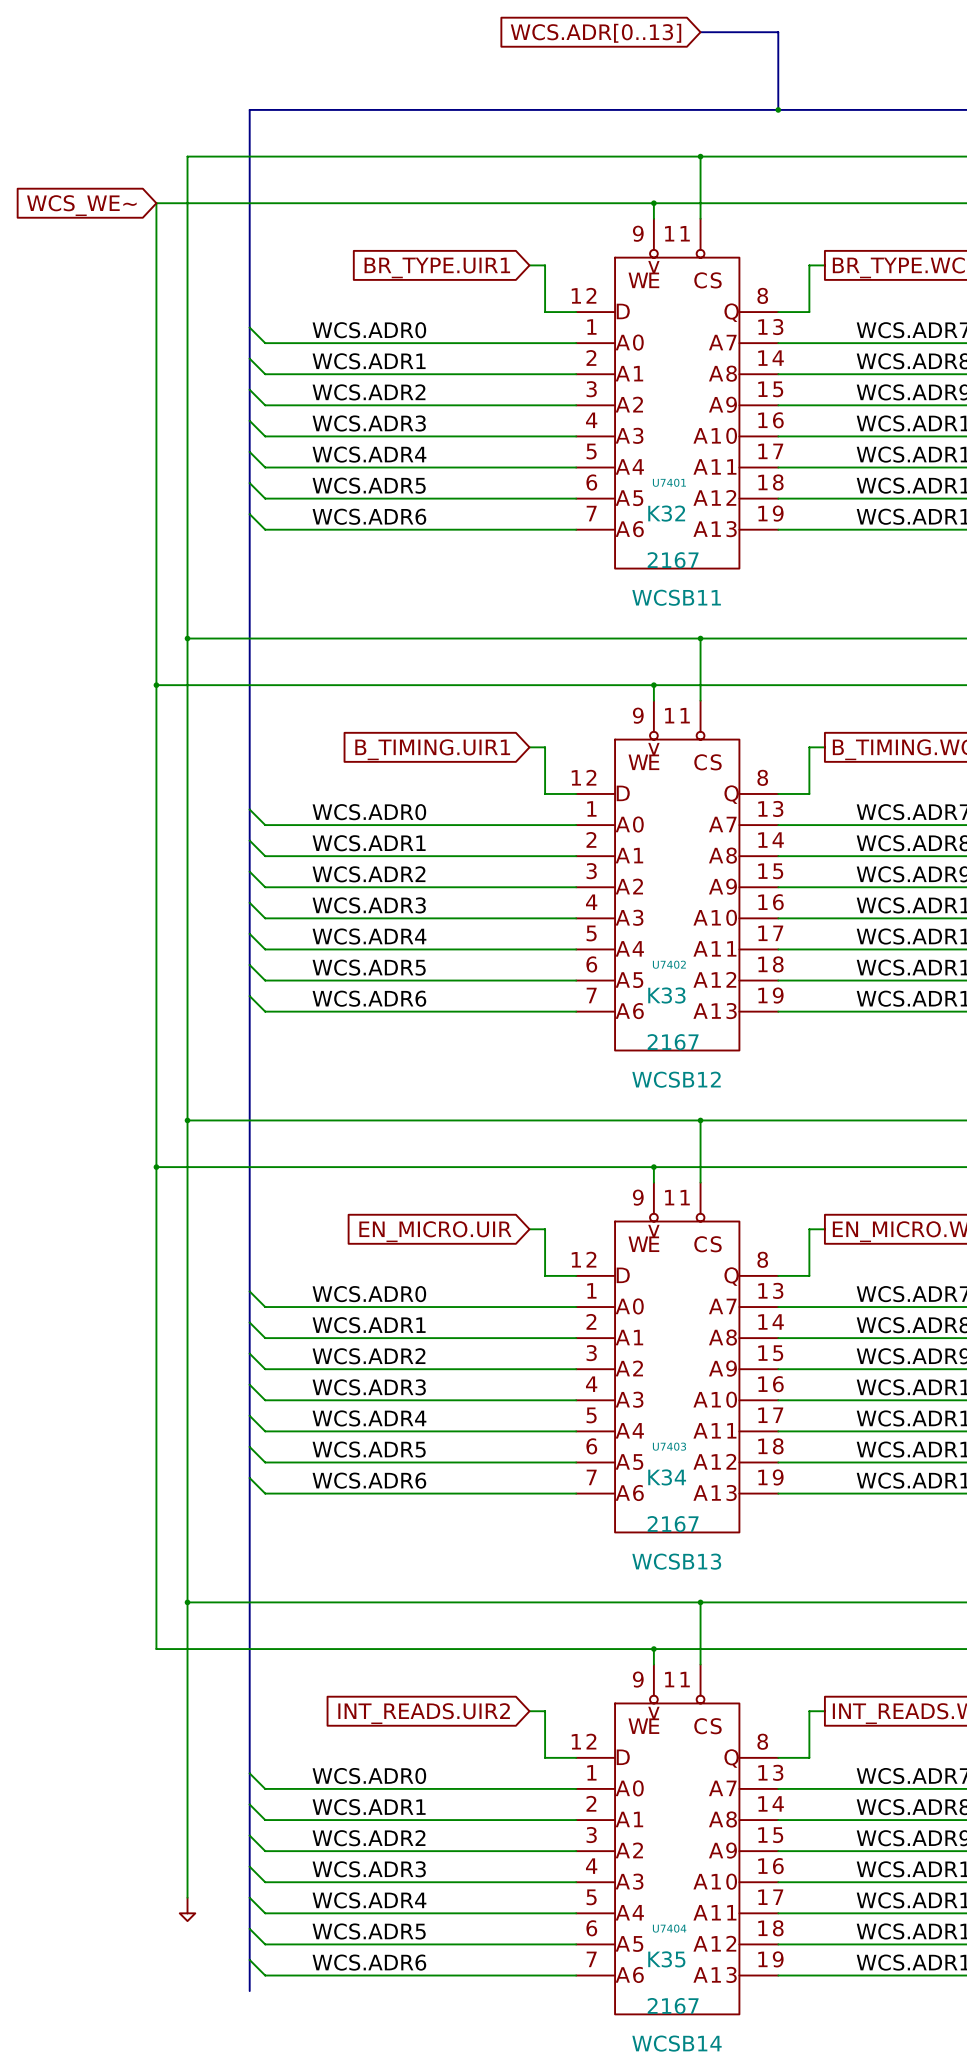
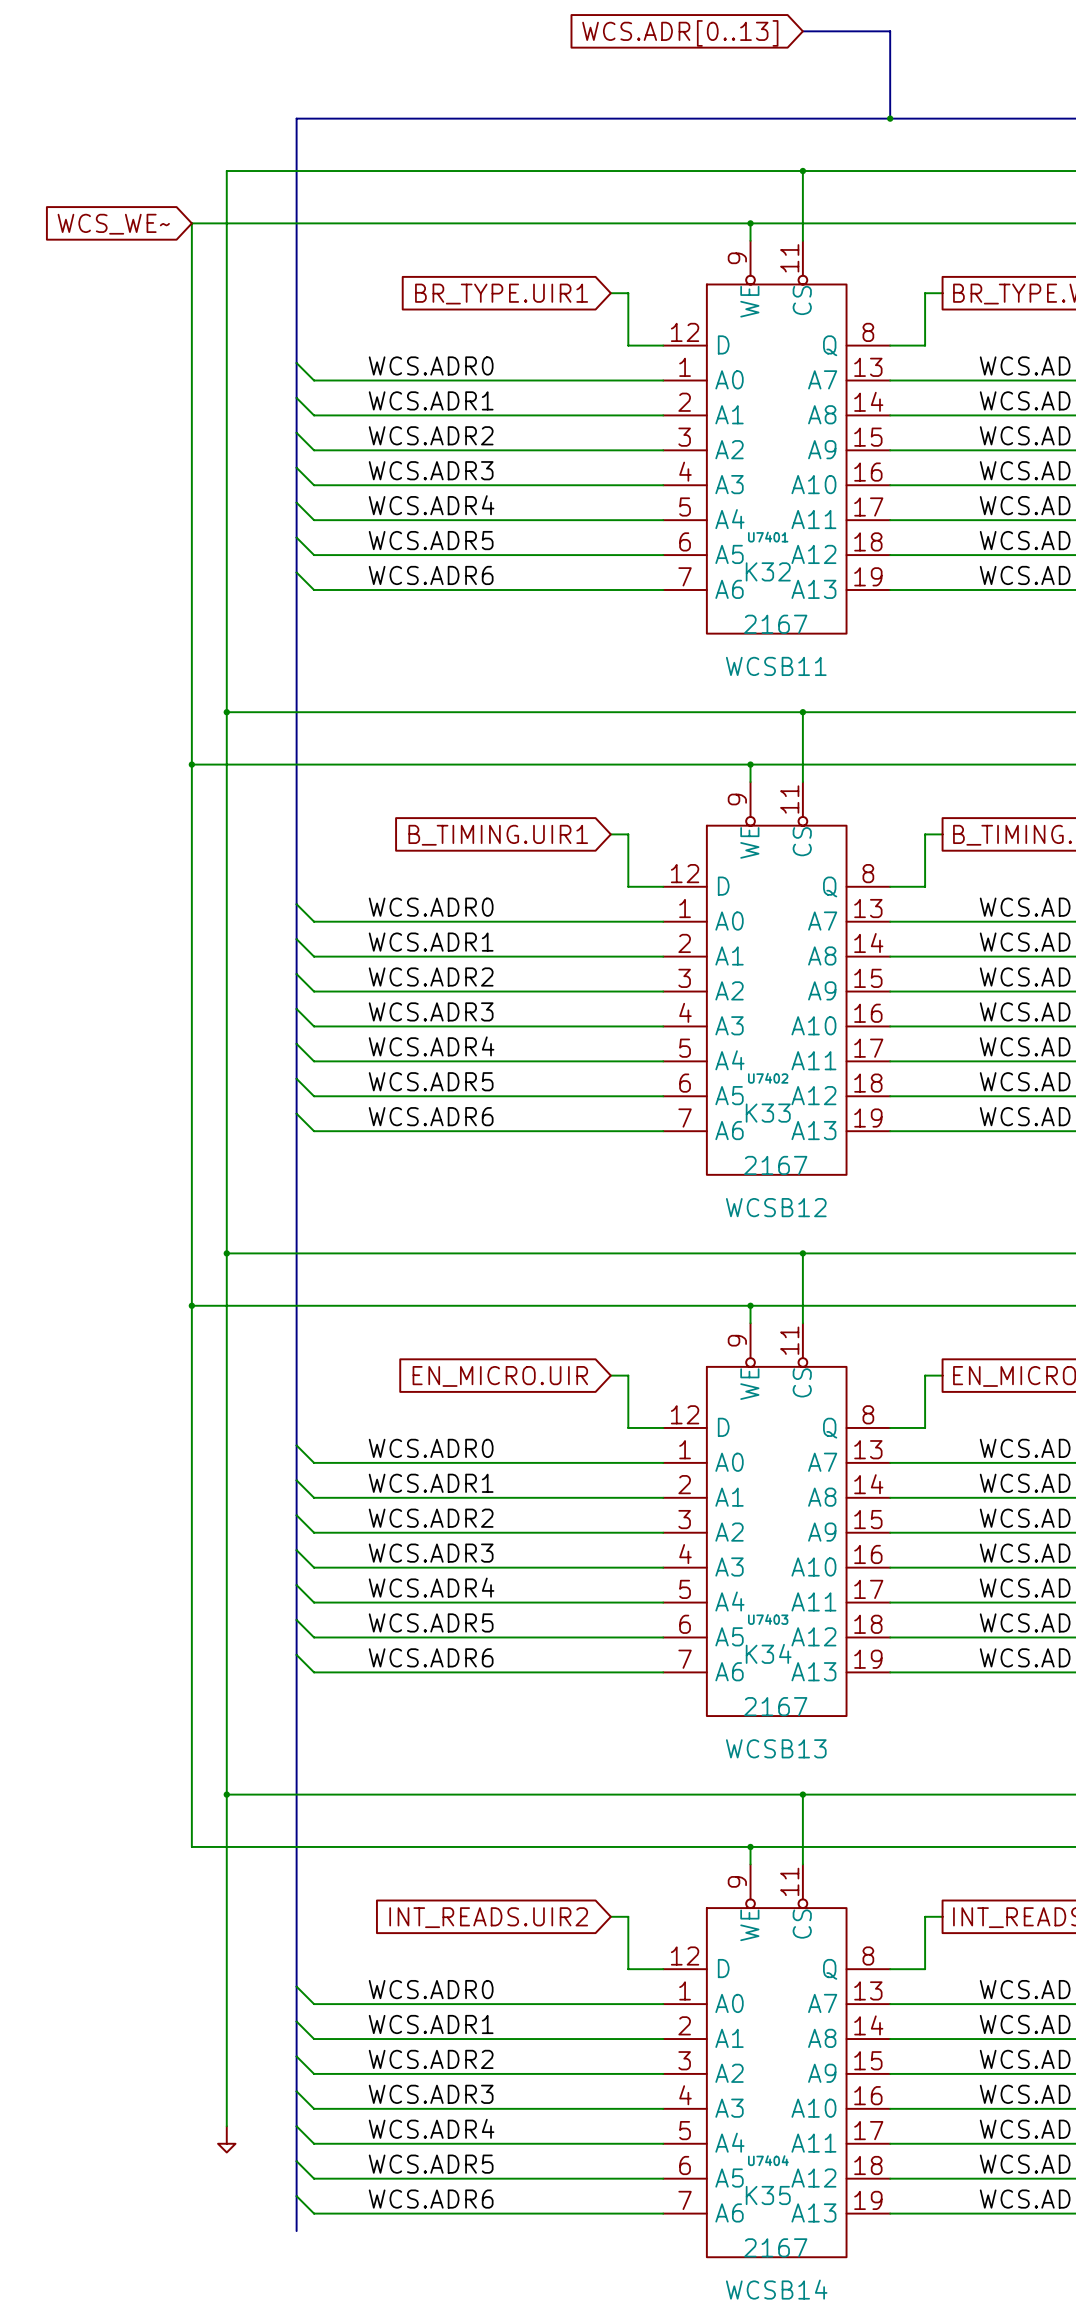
U7401 symbol: [576, 218, 779, 569] -> [663, 240, 891, 634]
U7402 symbol: [576, 700, 779, 1051] -> [663, 782, 891, 1175]
U7403 symbol: [576, 1182, 779, 1533] -> [663, 1323, 891, 1717]
U7404 symbol: [576, 1664, 779, 2015] -> [663, 1864, 891, 2258]

